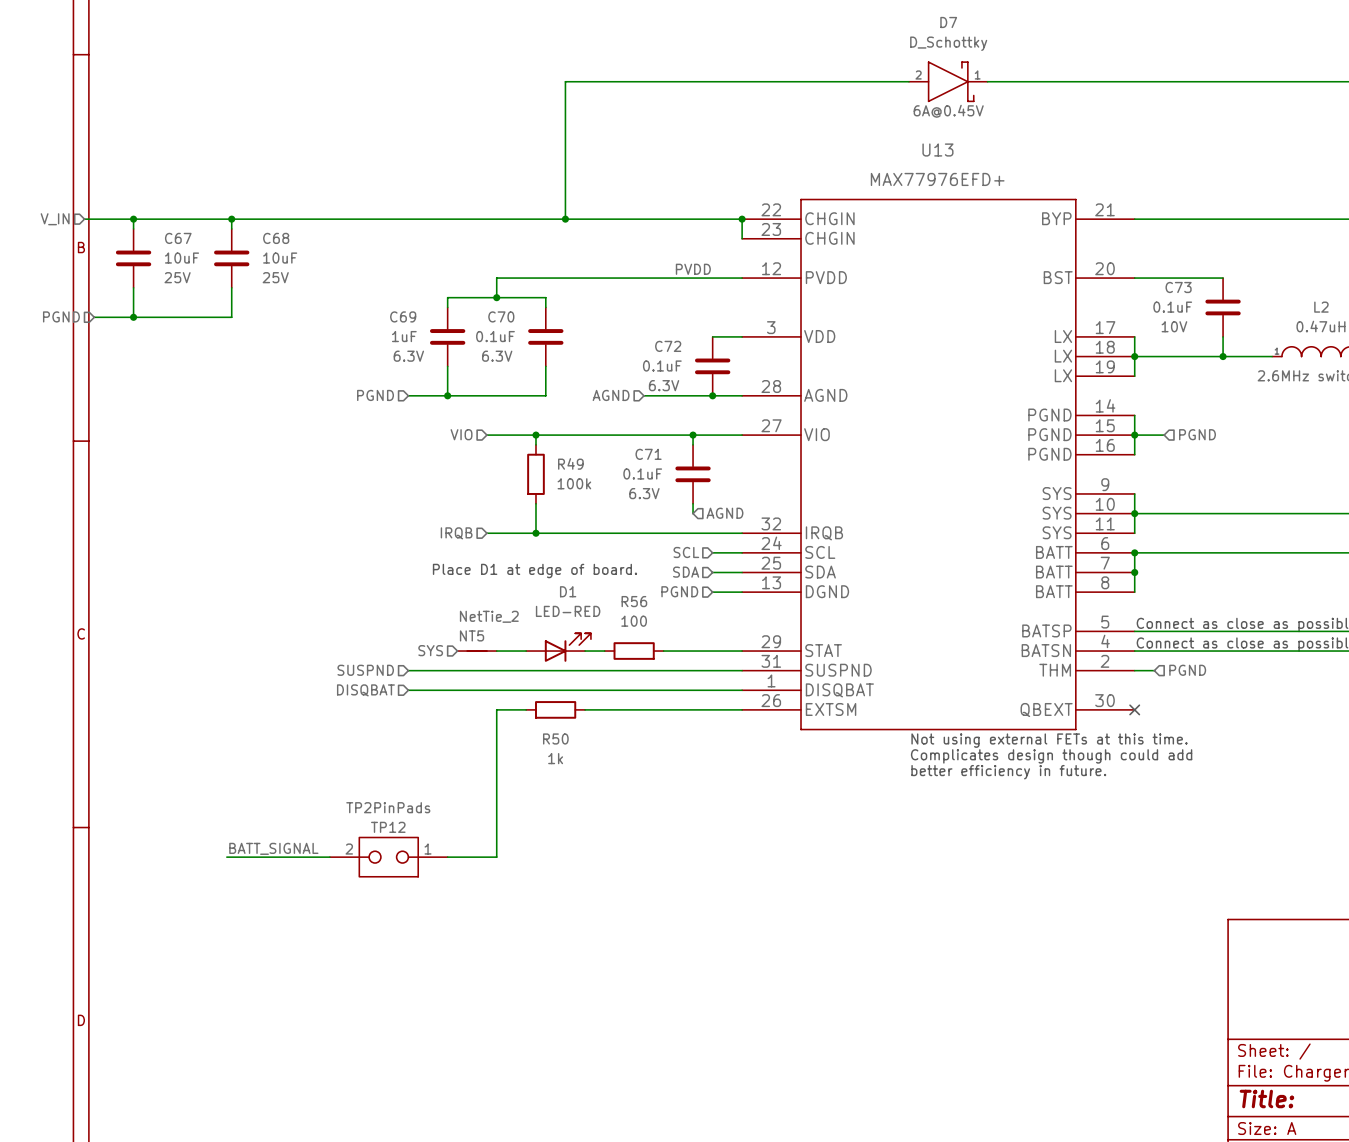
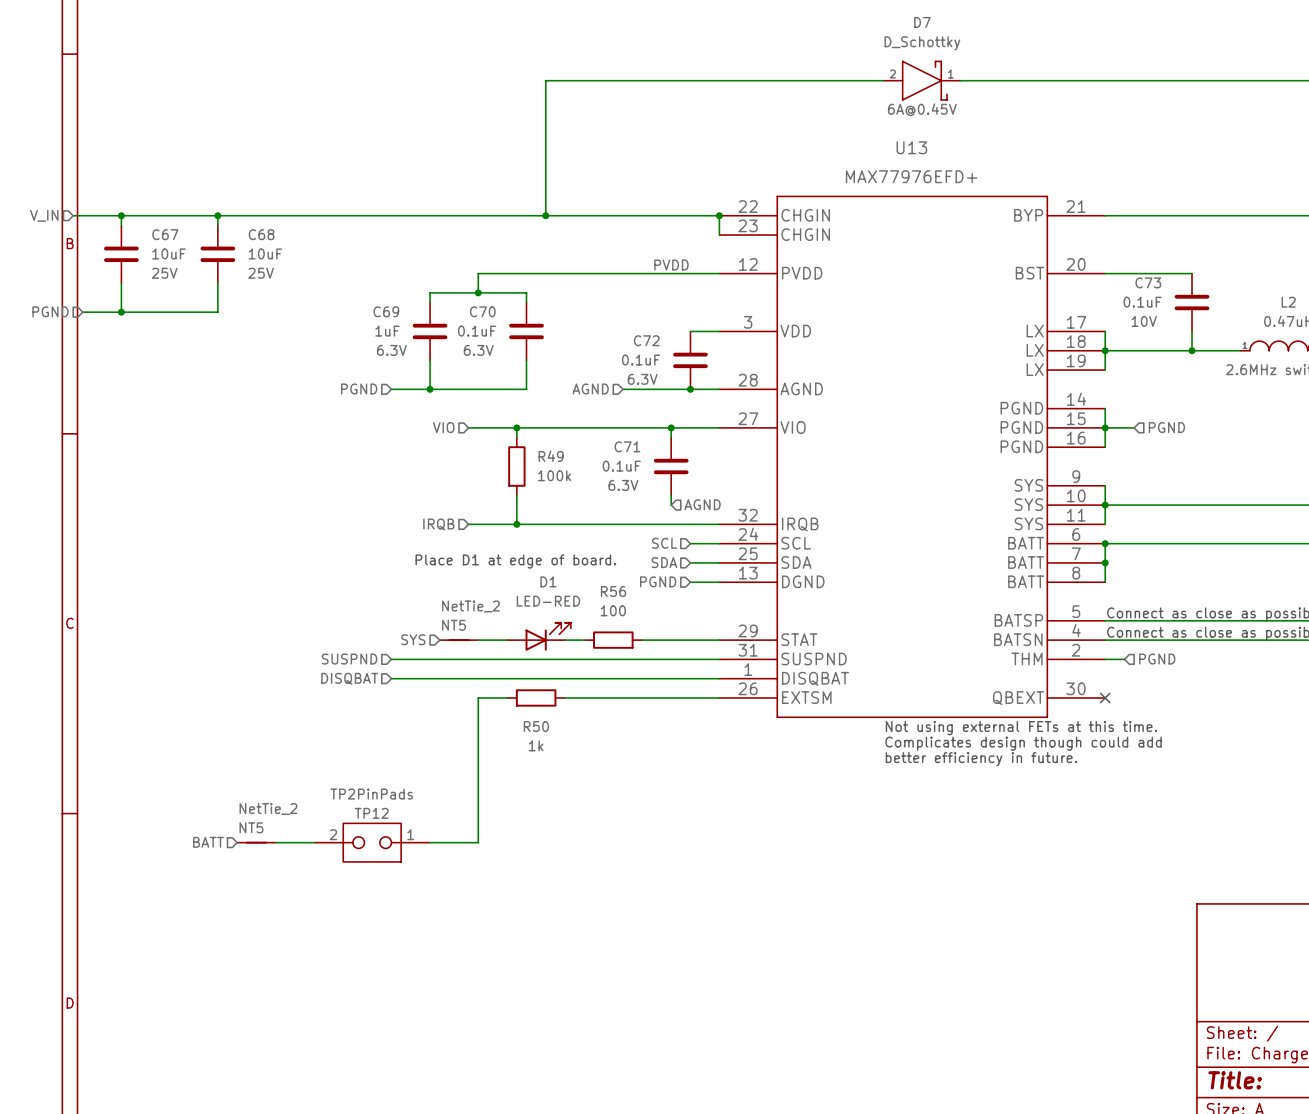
label: BATT_SIGNAL (273, 848) -> none
hierarchical label: none -> BATT (208, 842)
NT5: none -> NetTie_2 (256, 842)

